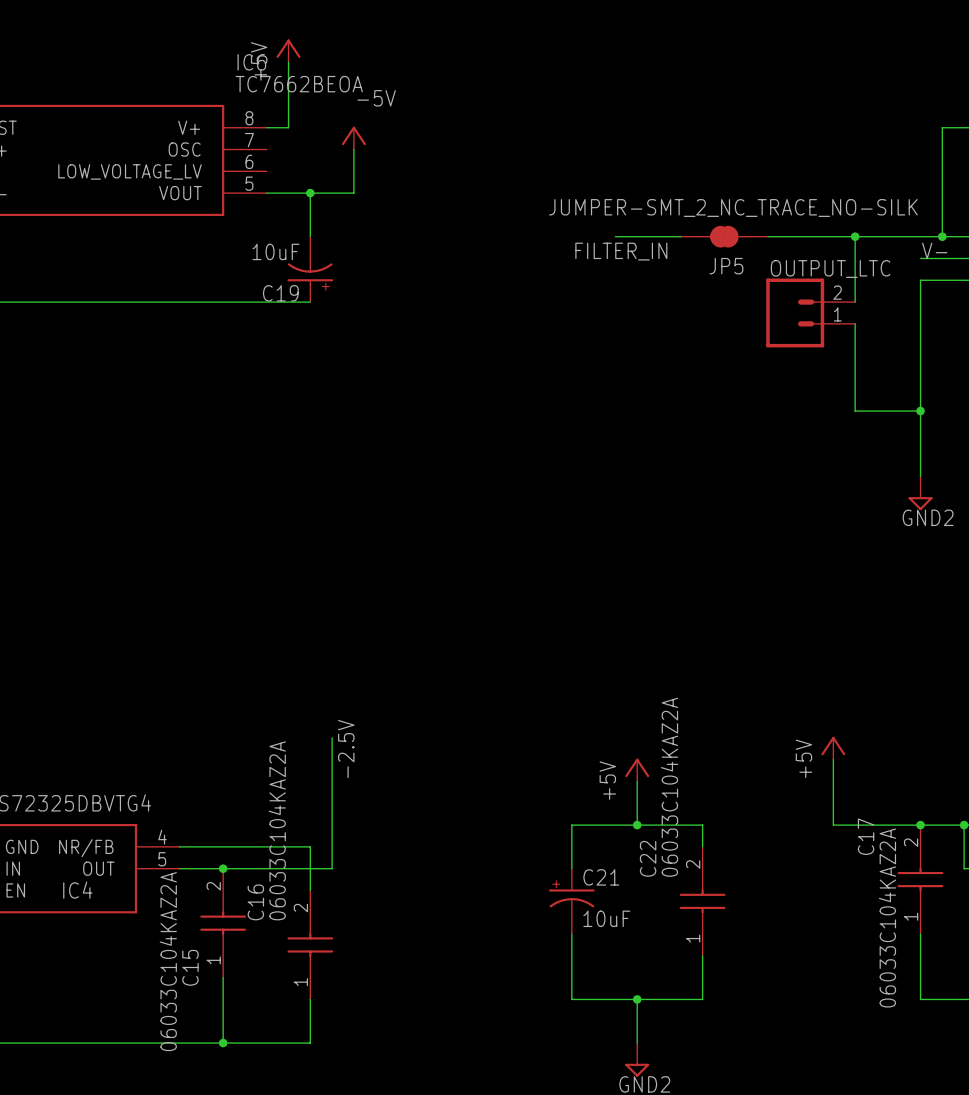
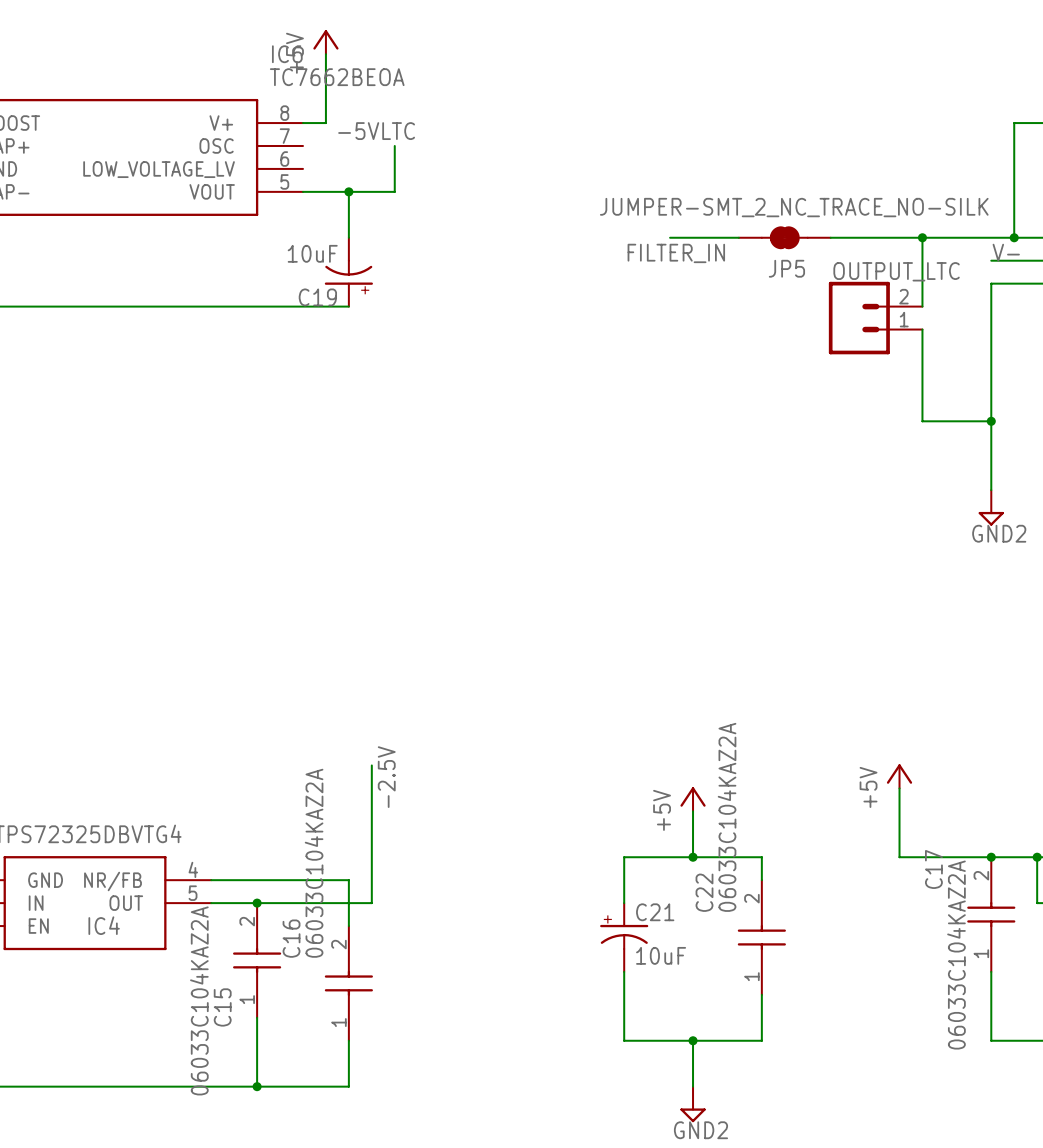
label: none -> -5VLTC (376, 131)
power symbol: -5V (353, 138) -> none

